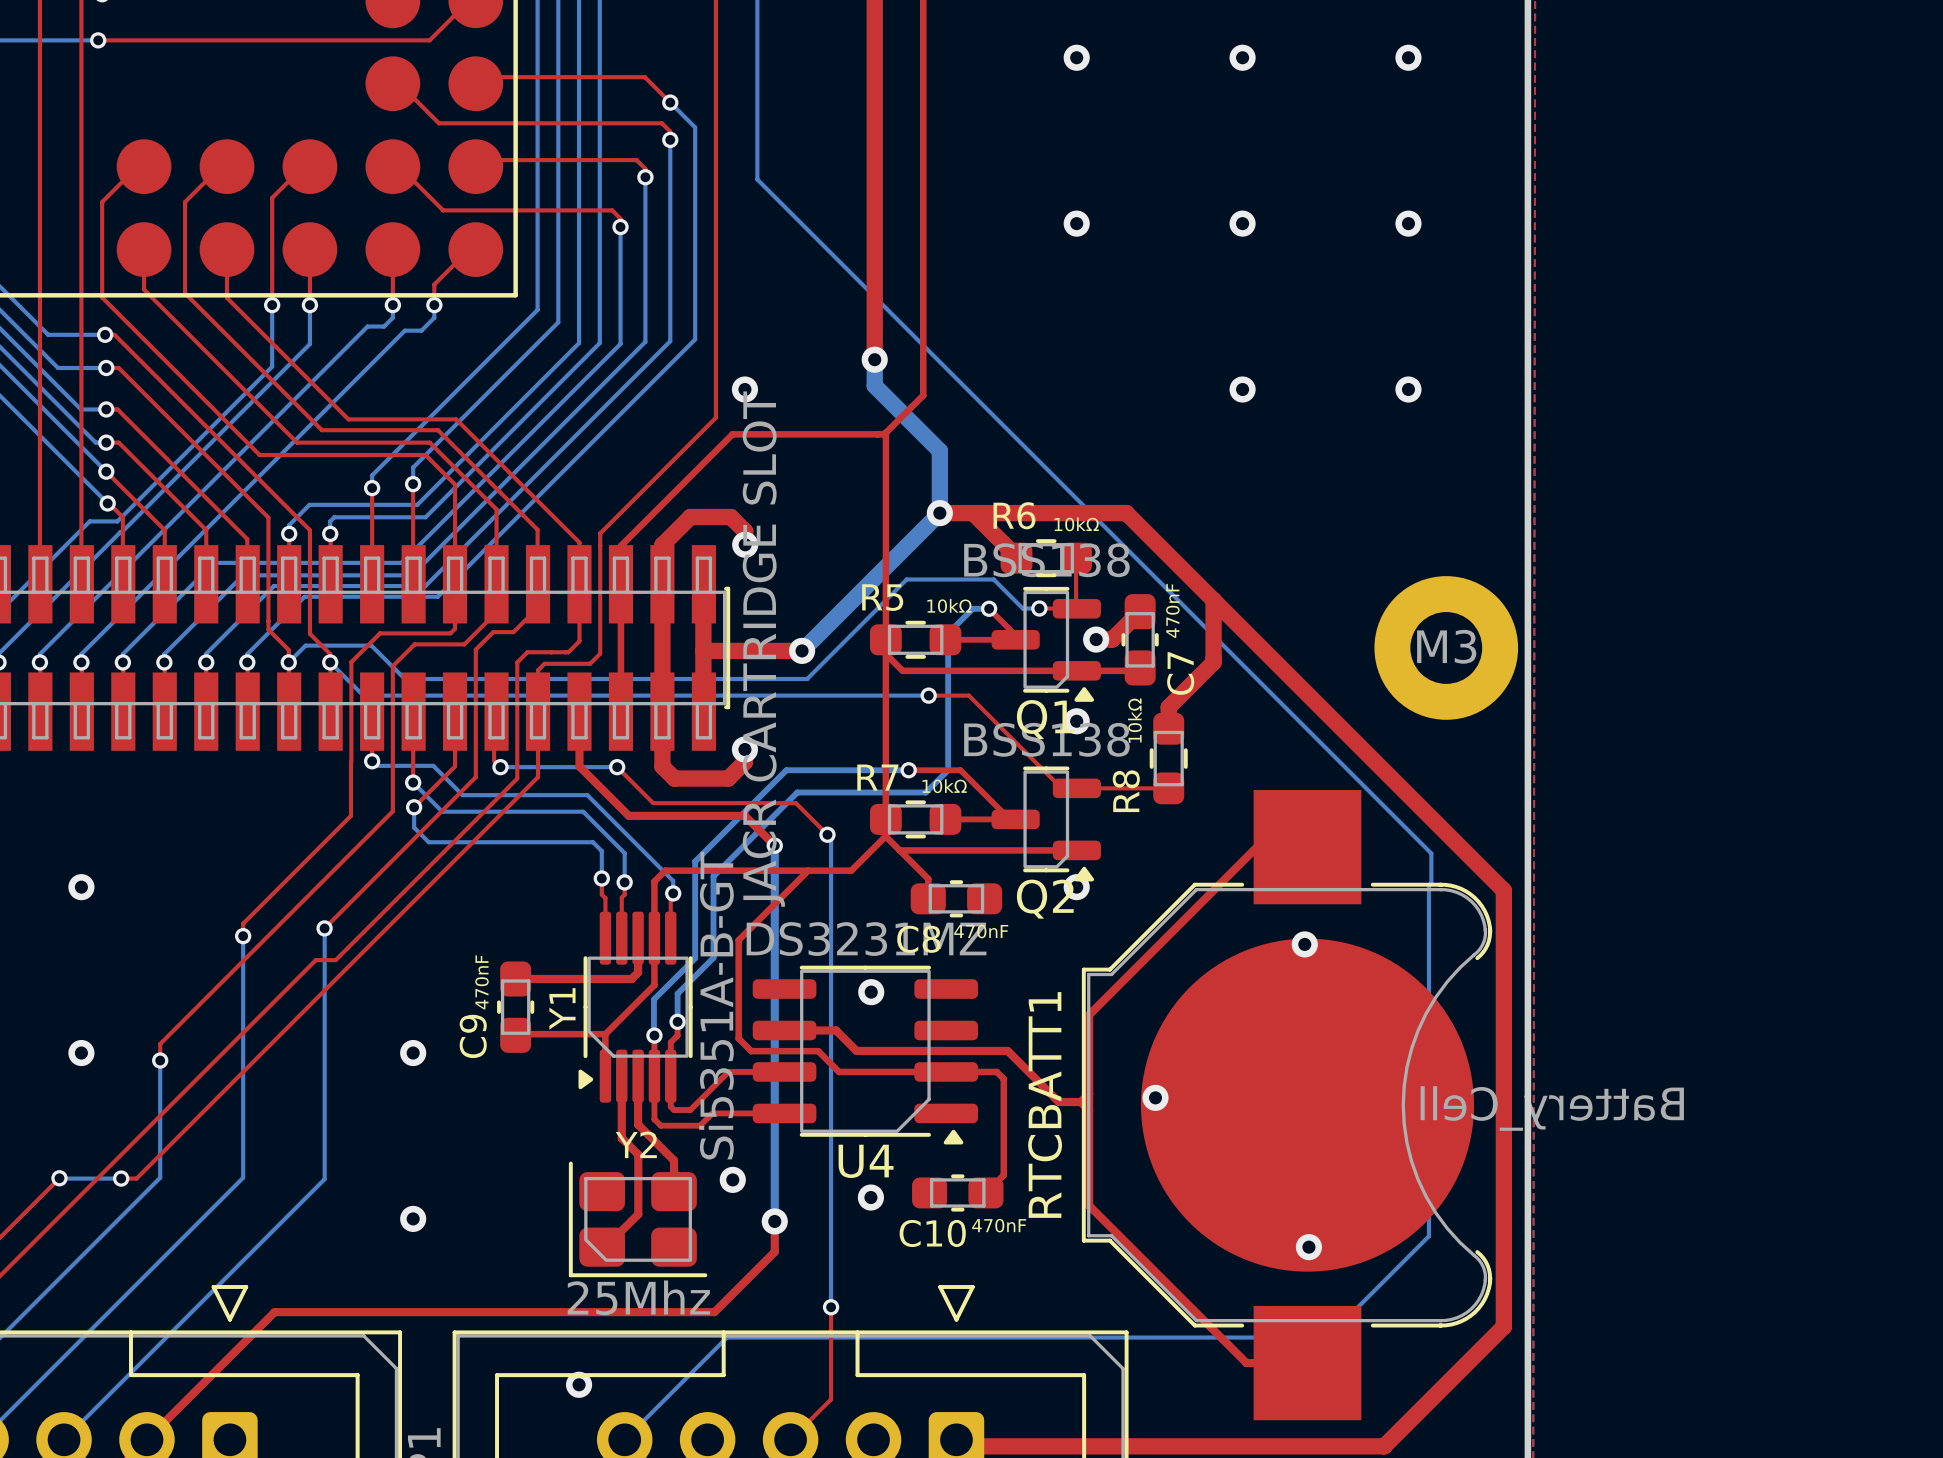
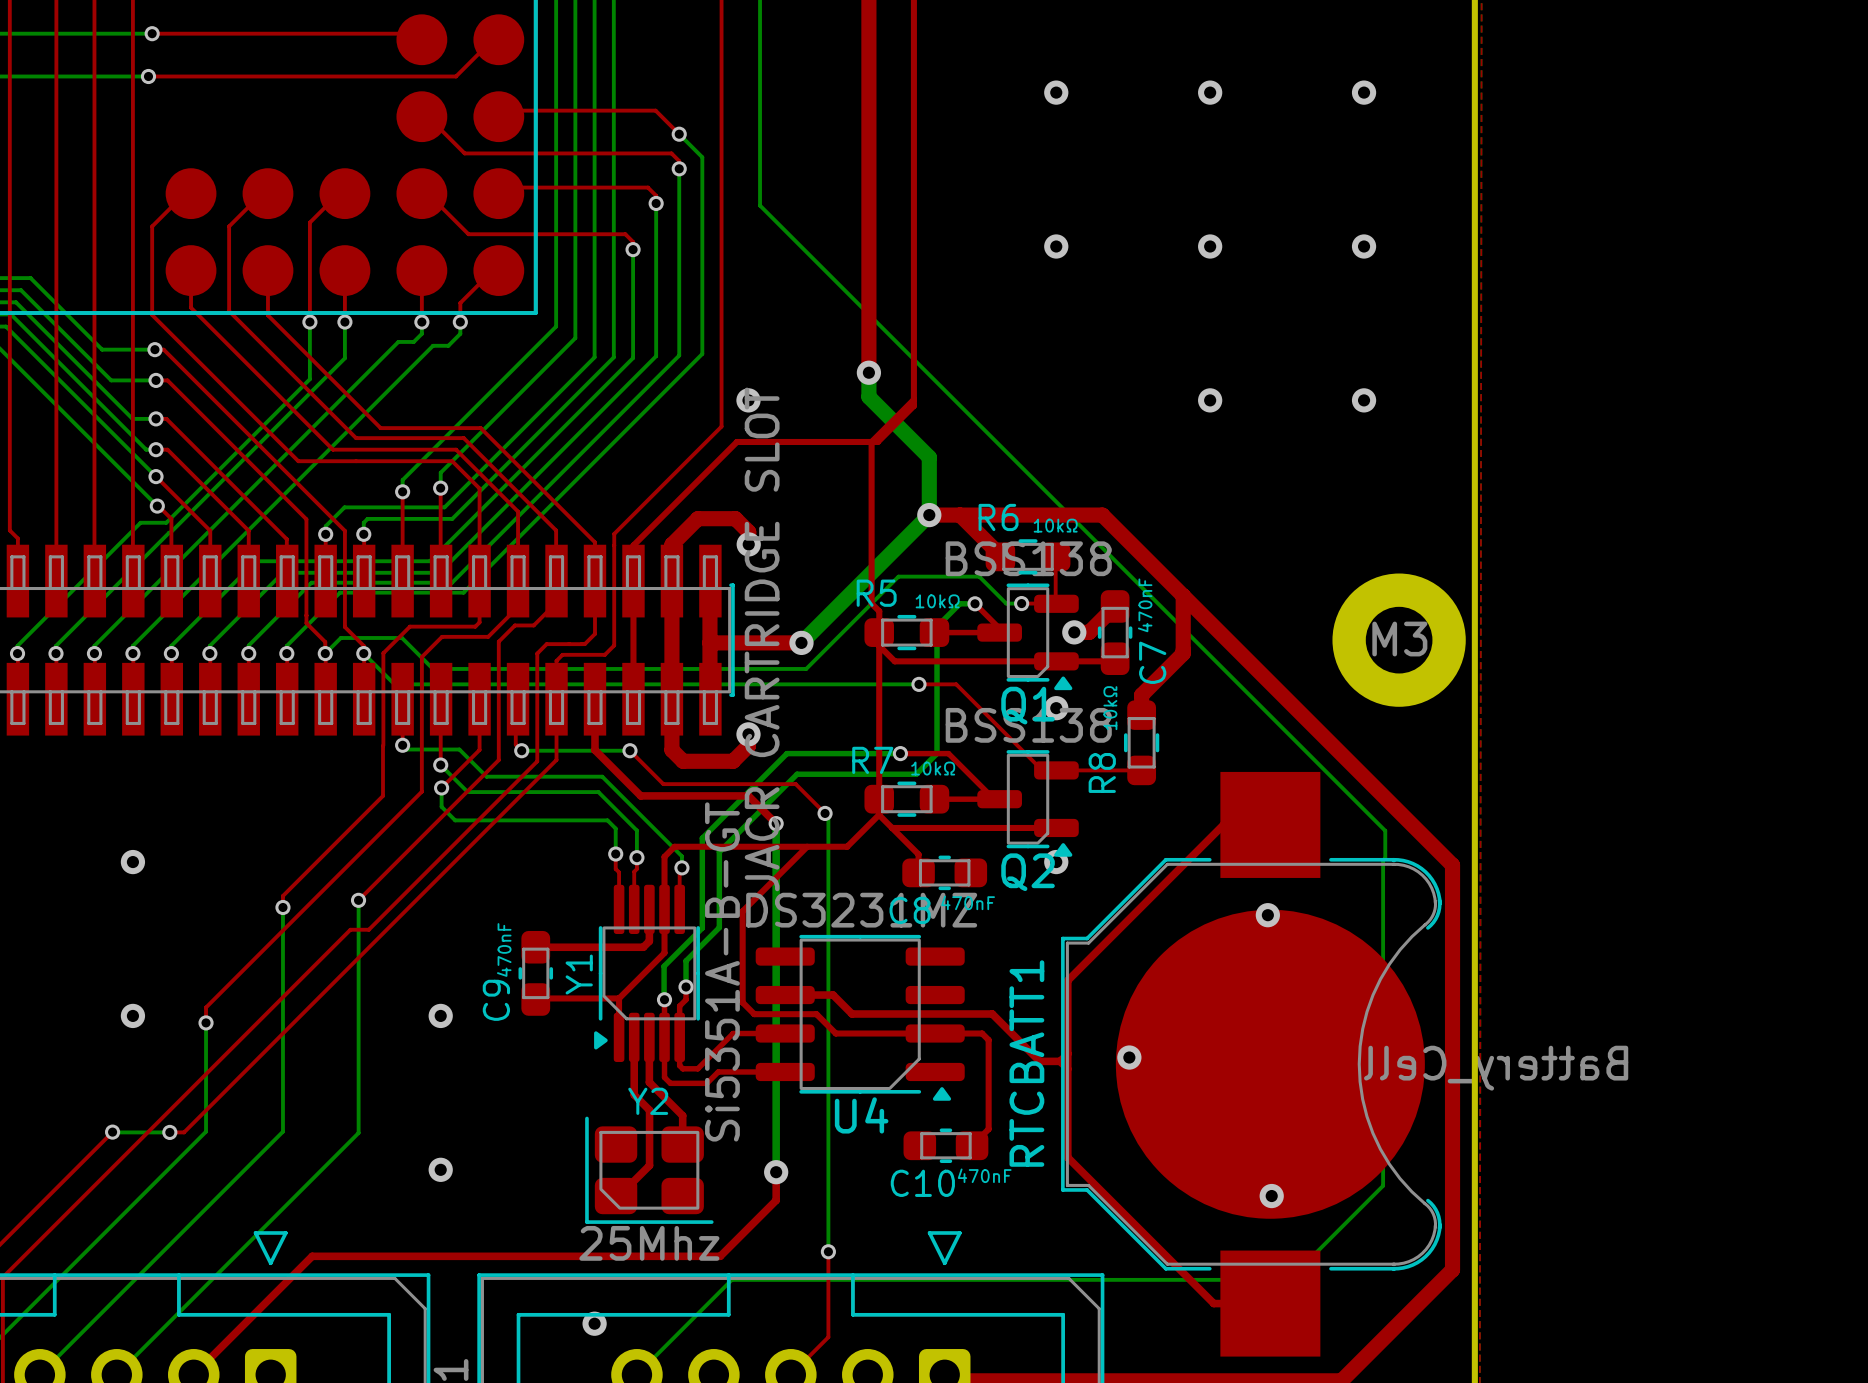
top track: (885, 432) (885, 616) -> (913, 399) (871, 441) (871, 603) (879, 611)
via: (871, 992) -> none
via: (732, 1179) -> none
via: (870, 1197) -> none

